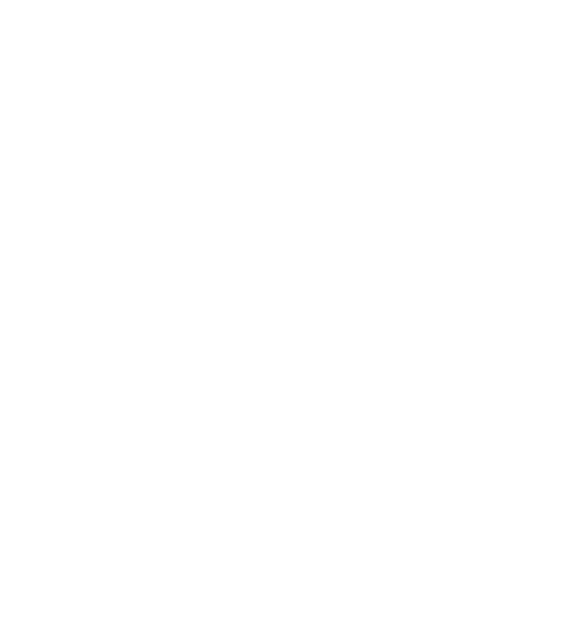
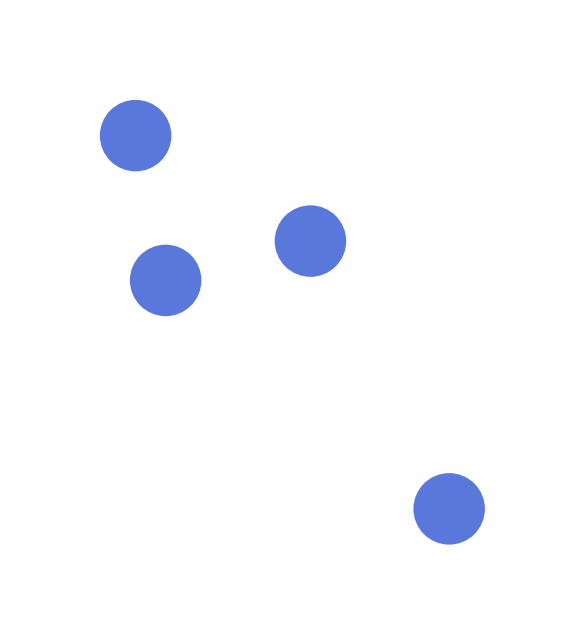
part: none -> (135, 135)
part: none -> (310, 241)
part: none -> (165, 280)
part: none -> (449, 508)

